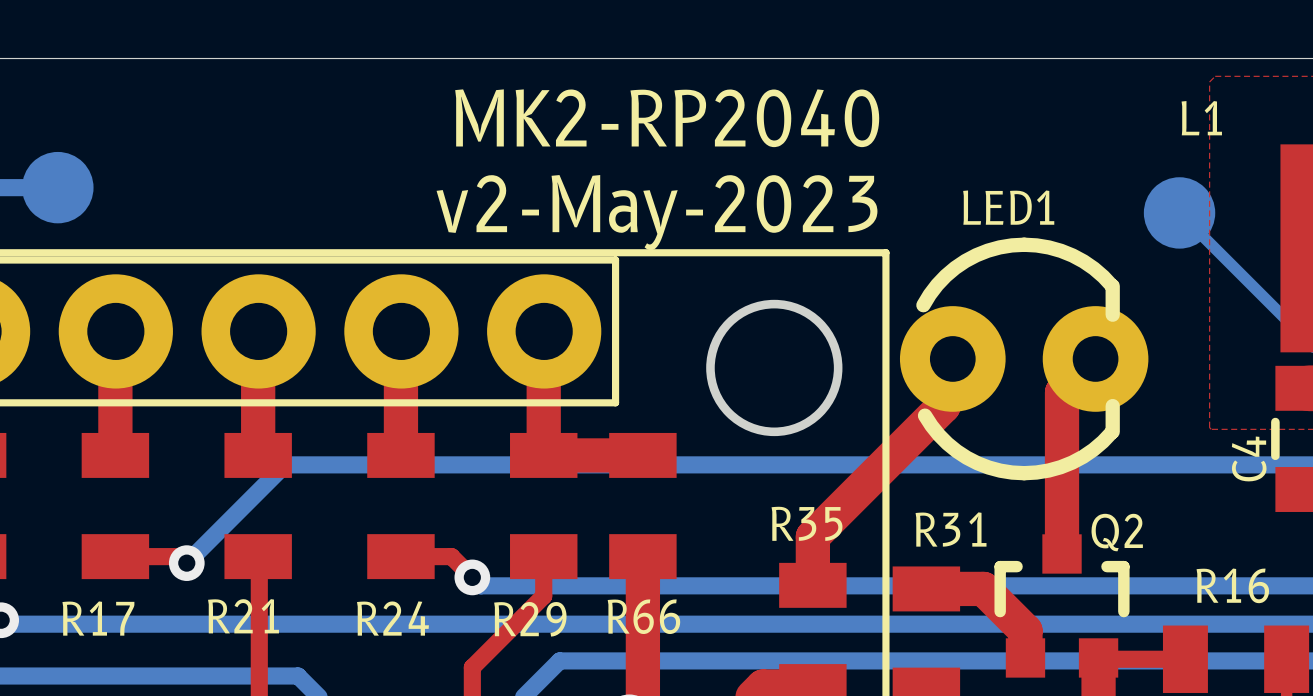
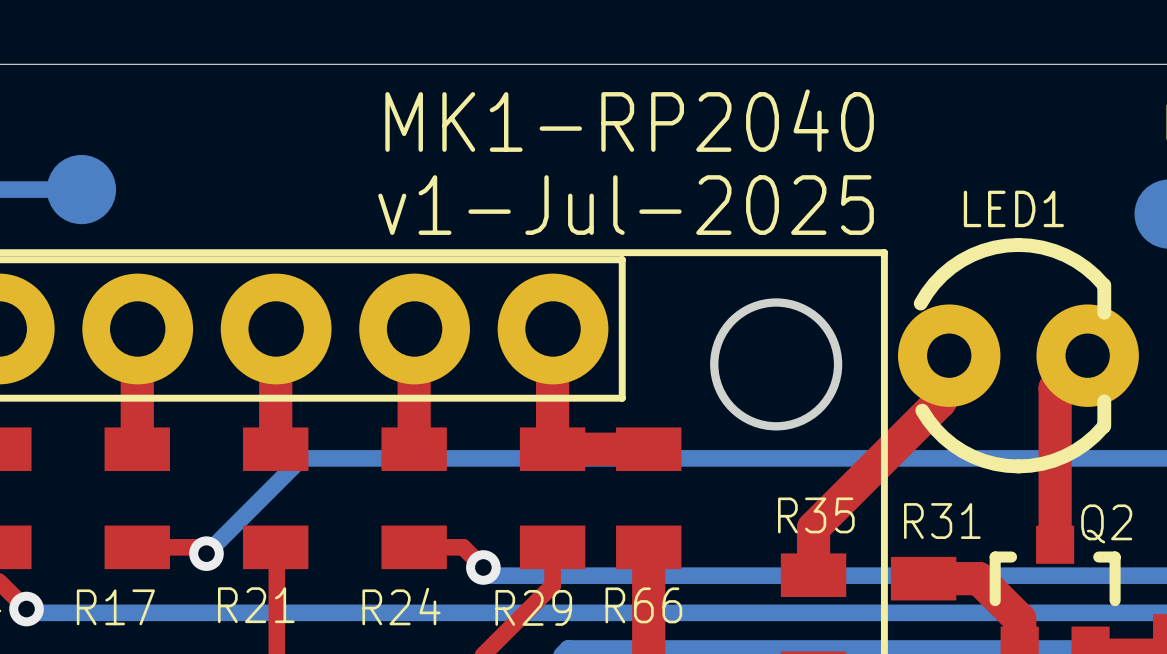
text: MK2-RP2040 (667, 118) -> MK1-RP2040 (629, 120)
text: v2-May-2023 (657, 212) -> v1-Jul-2025 (626, 205)

